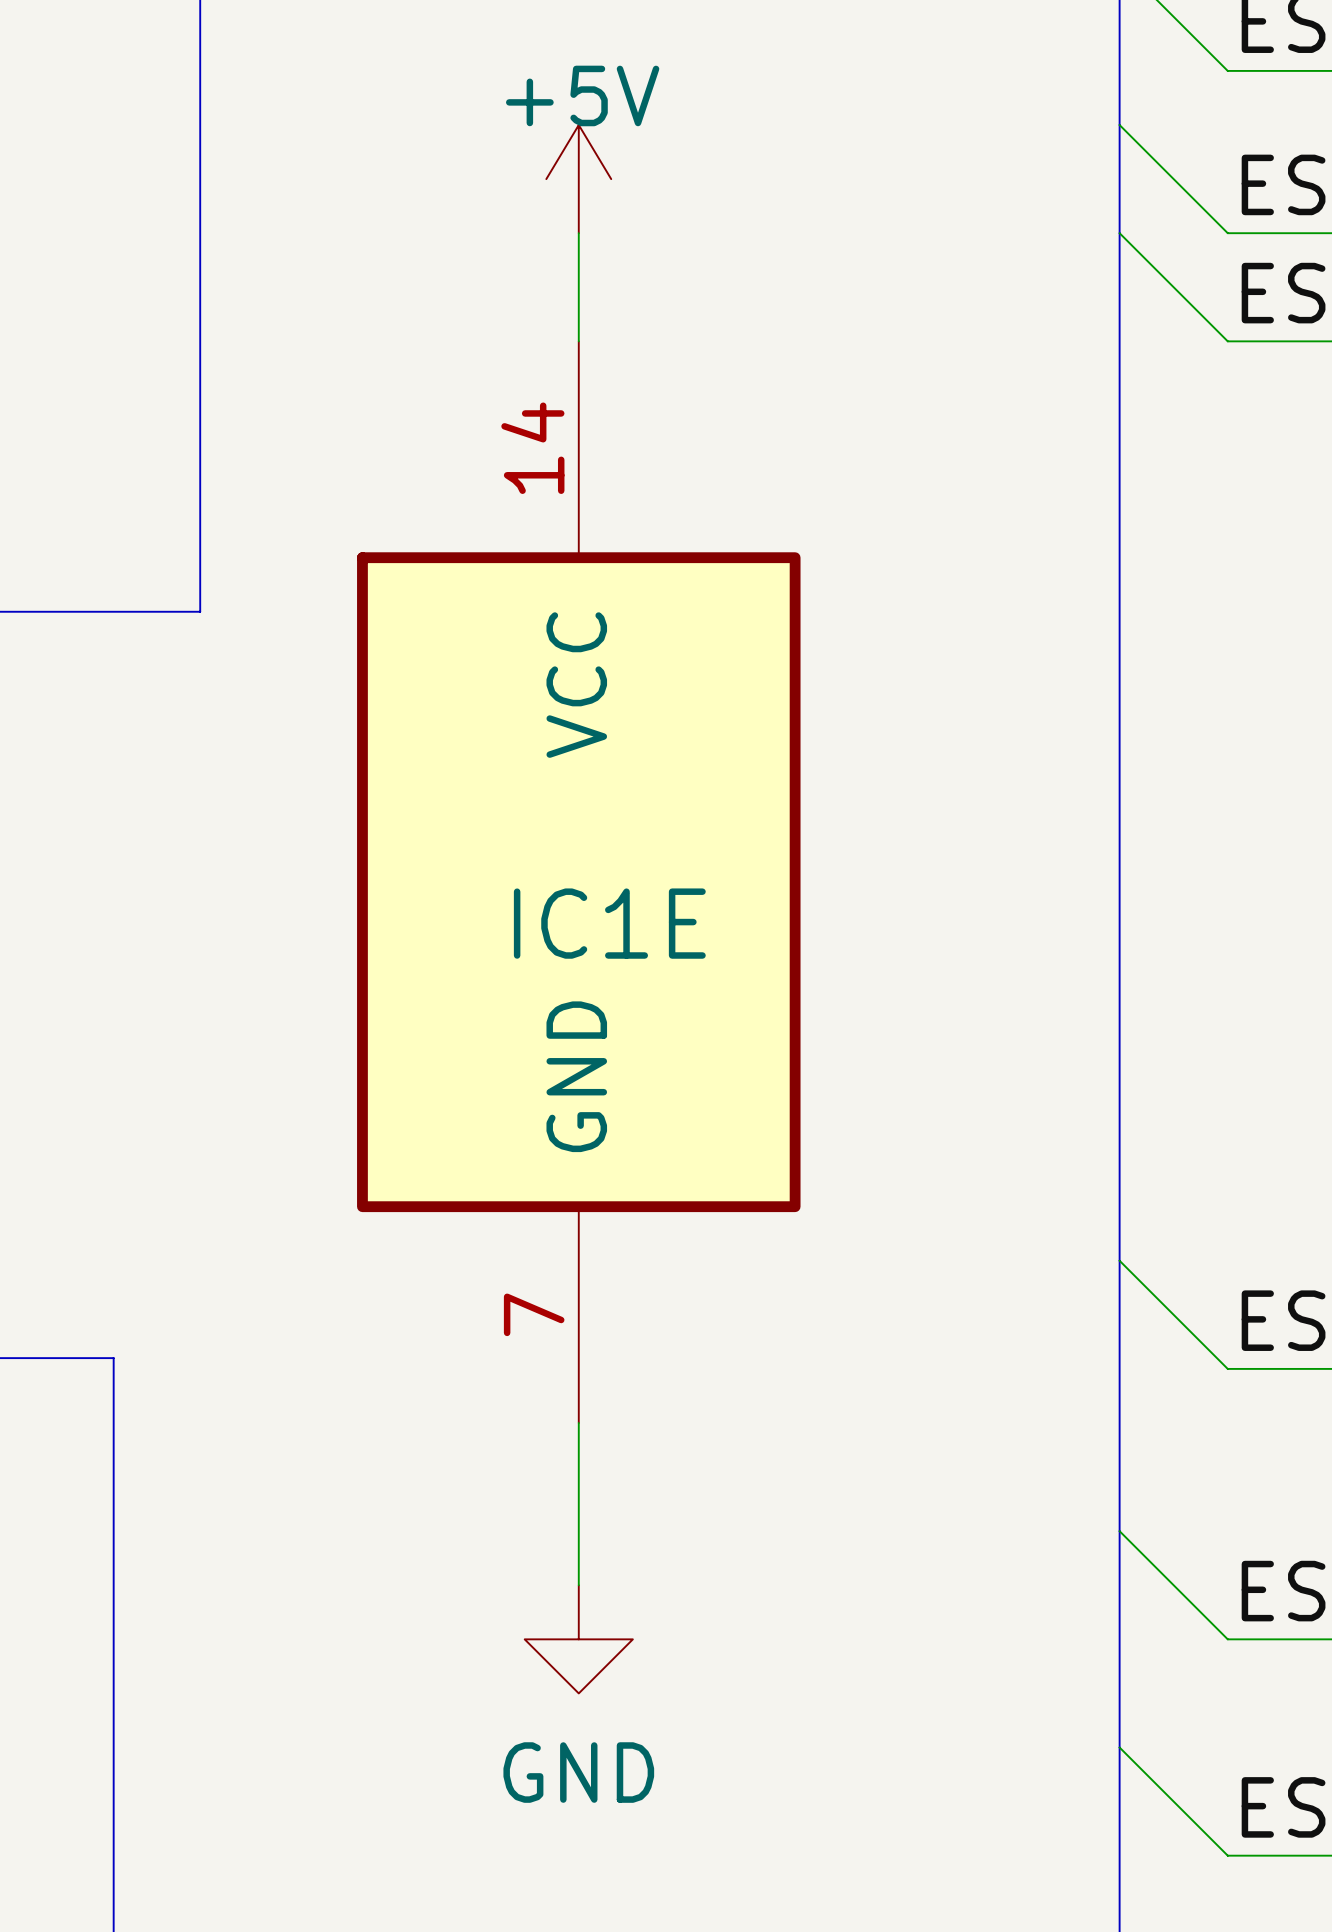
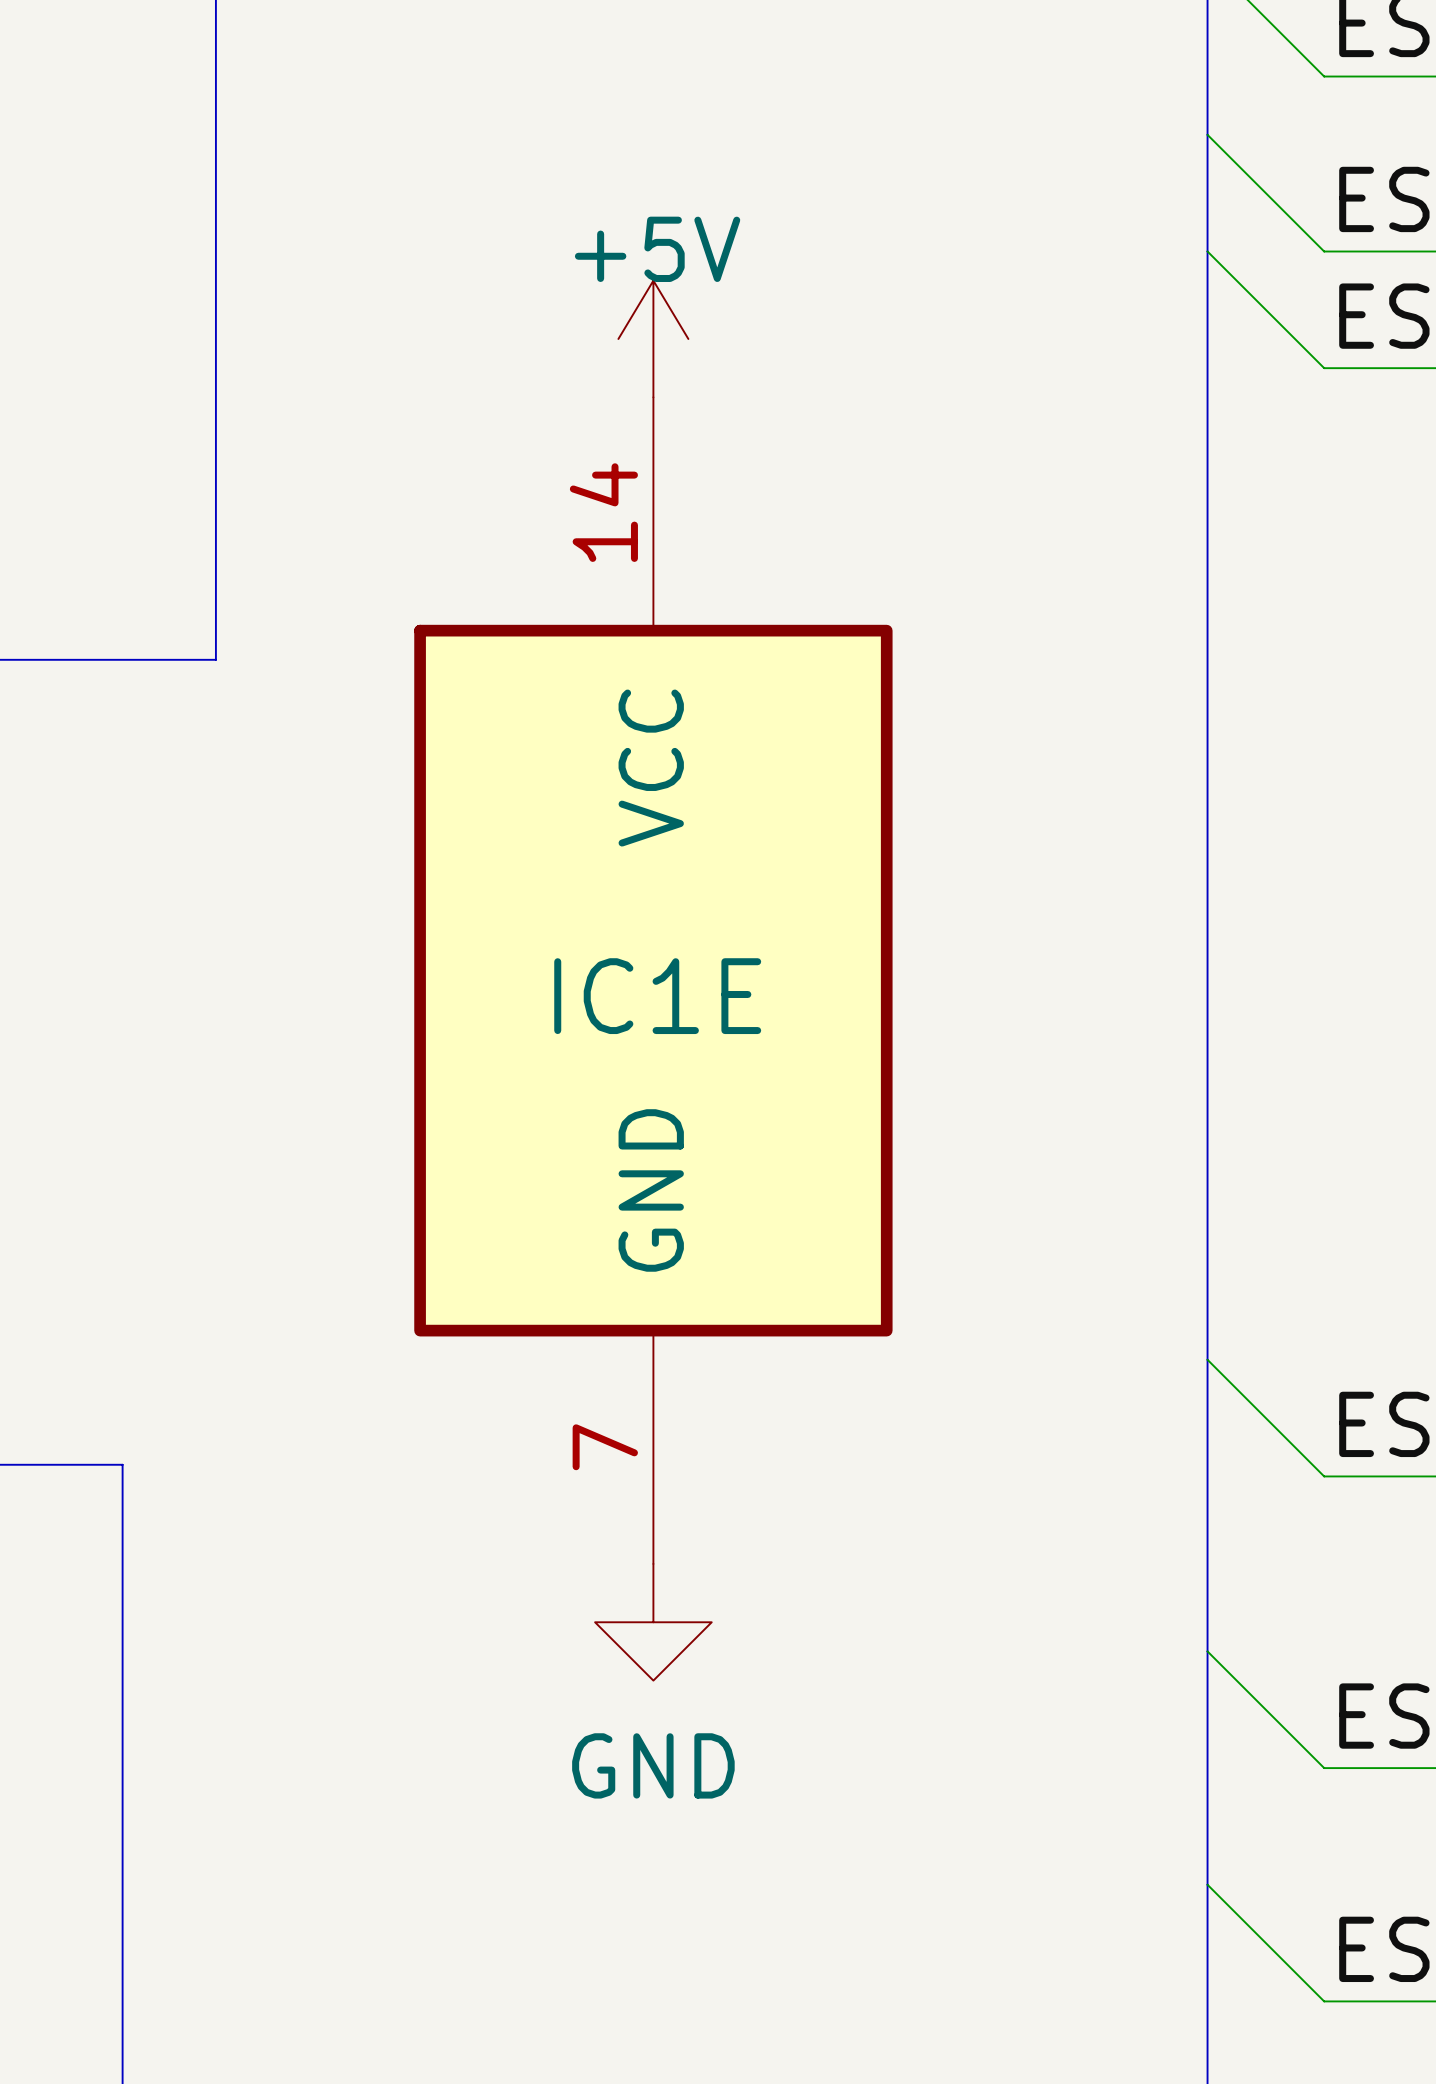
power symbol position: +5V (578, 179) -> +5V (653, 339)
wire: (578, 233) (578, 341) -> none
IC1E position: (578, 882) -> (653, 980)
wire: (578, 1423) (578, 1585) -> none
power symbol position: GND (578, 1639) -> GND (653, 1622)

